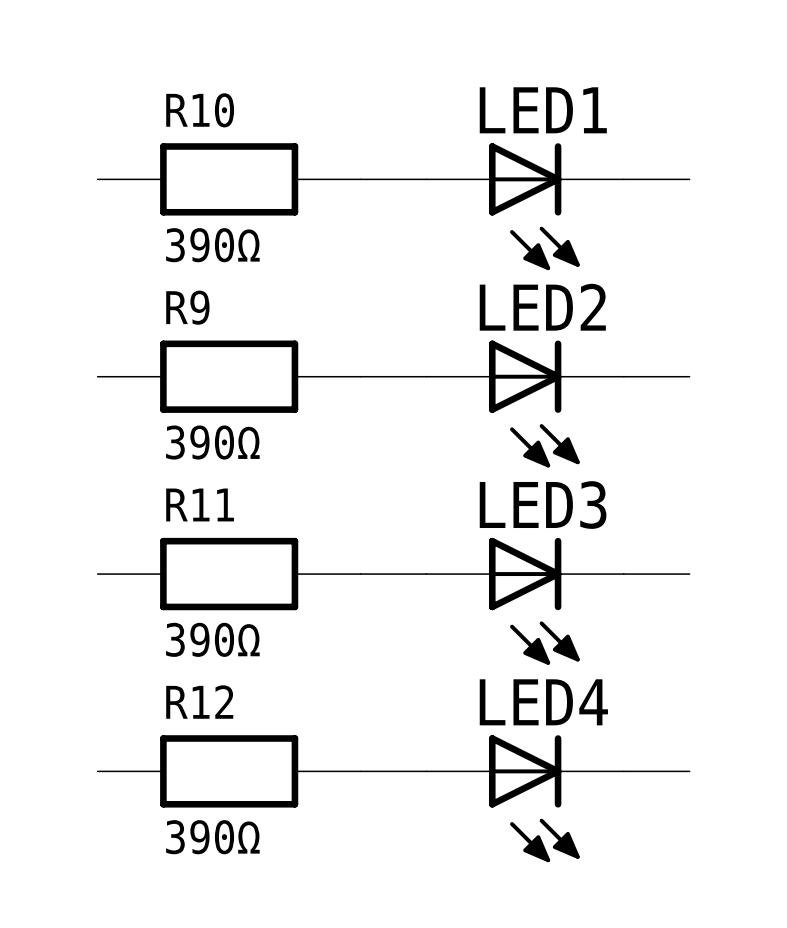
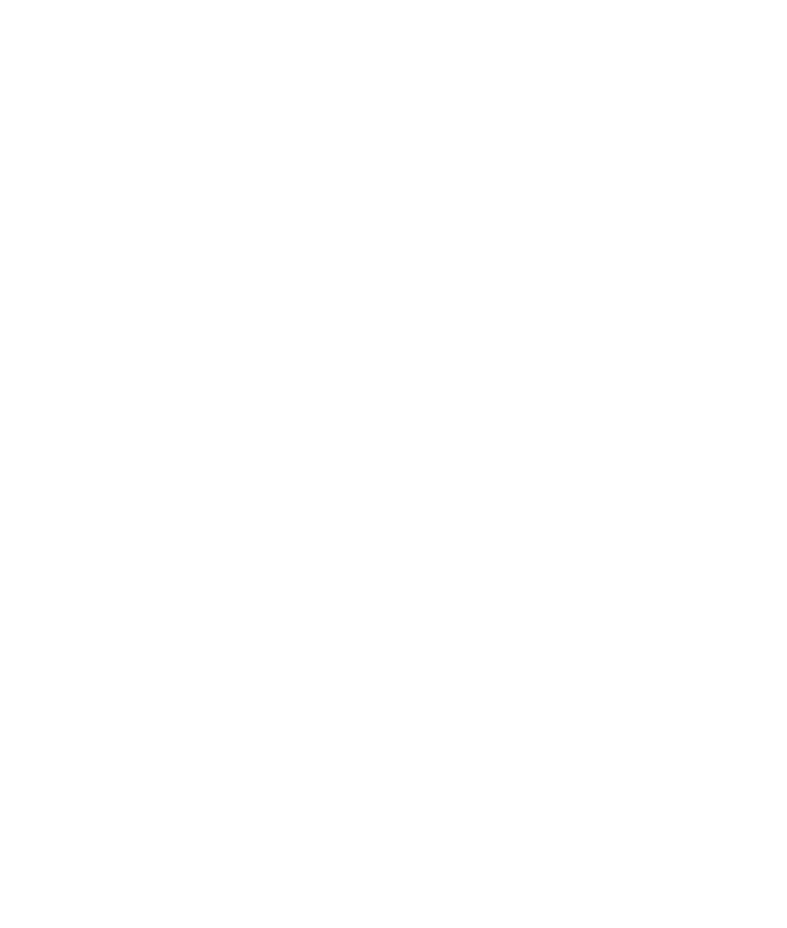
R10: 390Ω (229, 179) -> none
wire: (360, 179) (426, 179) -> none
wire: (623, 179) (689, 179) -> none
LED1: (525, 206) -> none
R9: 390Ω (229, 376) -> none
wire: (360, 376) (426, 376) -> none
wire: (623, 376) (689, 376) -> none
LED2: (525, 404) -> none
R11: 390Ω (229, 574) -> none
wire: (360, 574) (426, 574) -> none
wire: (623, 574) (689, 574) -> none
LED3: (525, 601) -> none
R12: 390Ω (229, 771) -> none
wire: (360, 771) (426, 771) -> none
wire: (623, 771) (689, 771) -> none
LED4: (525, 798) -> none

